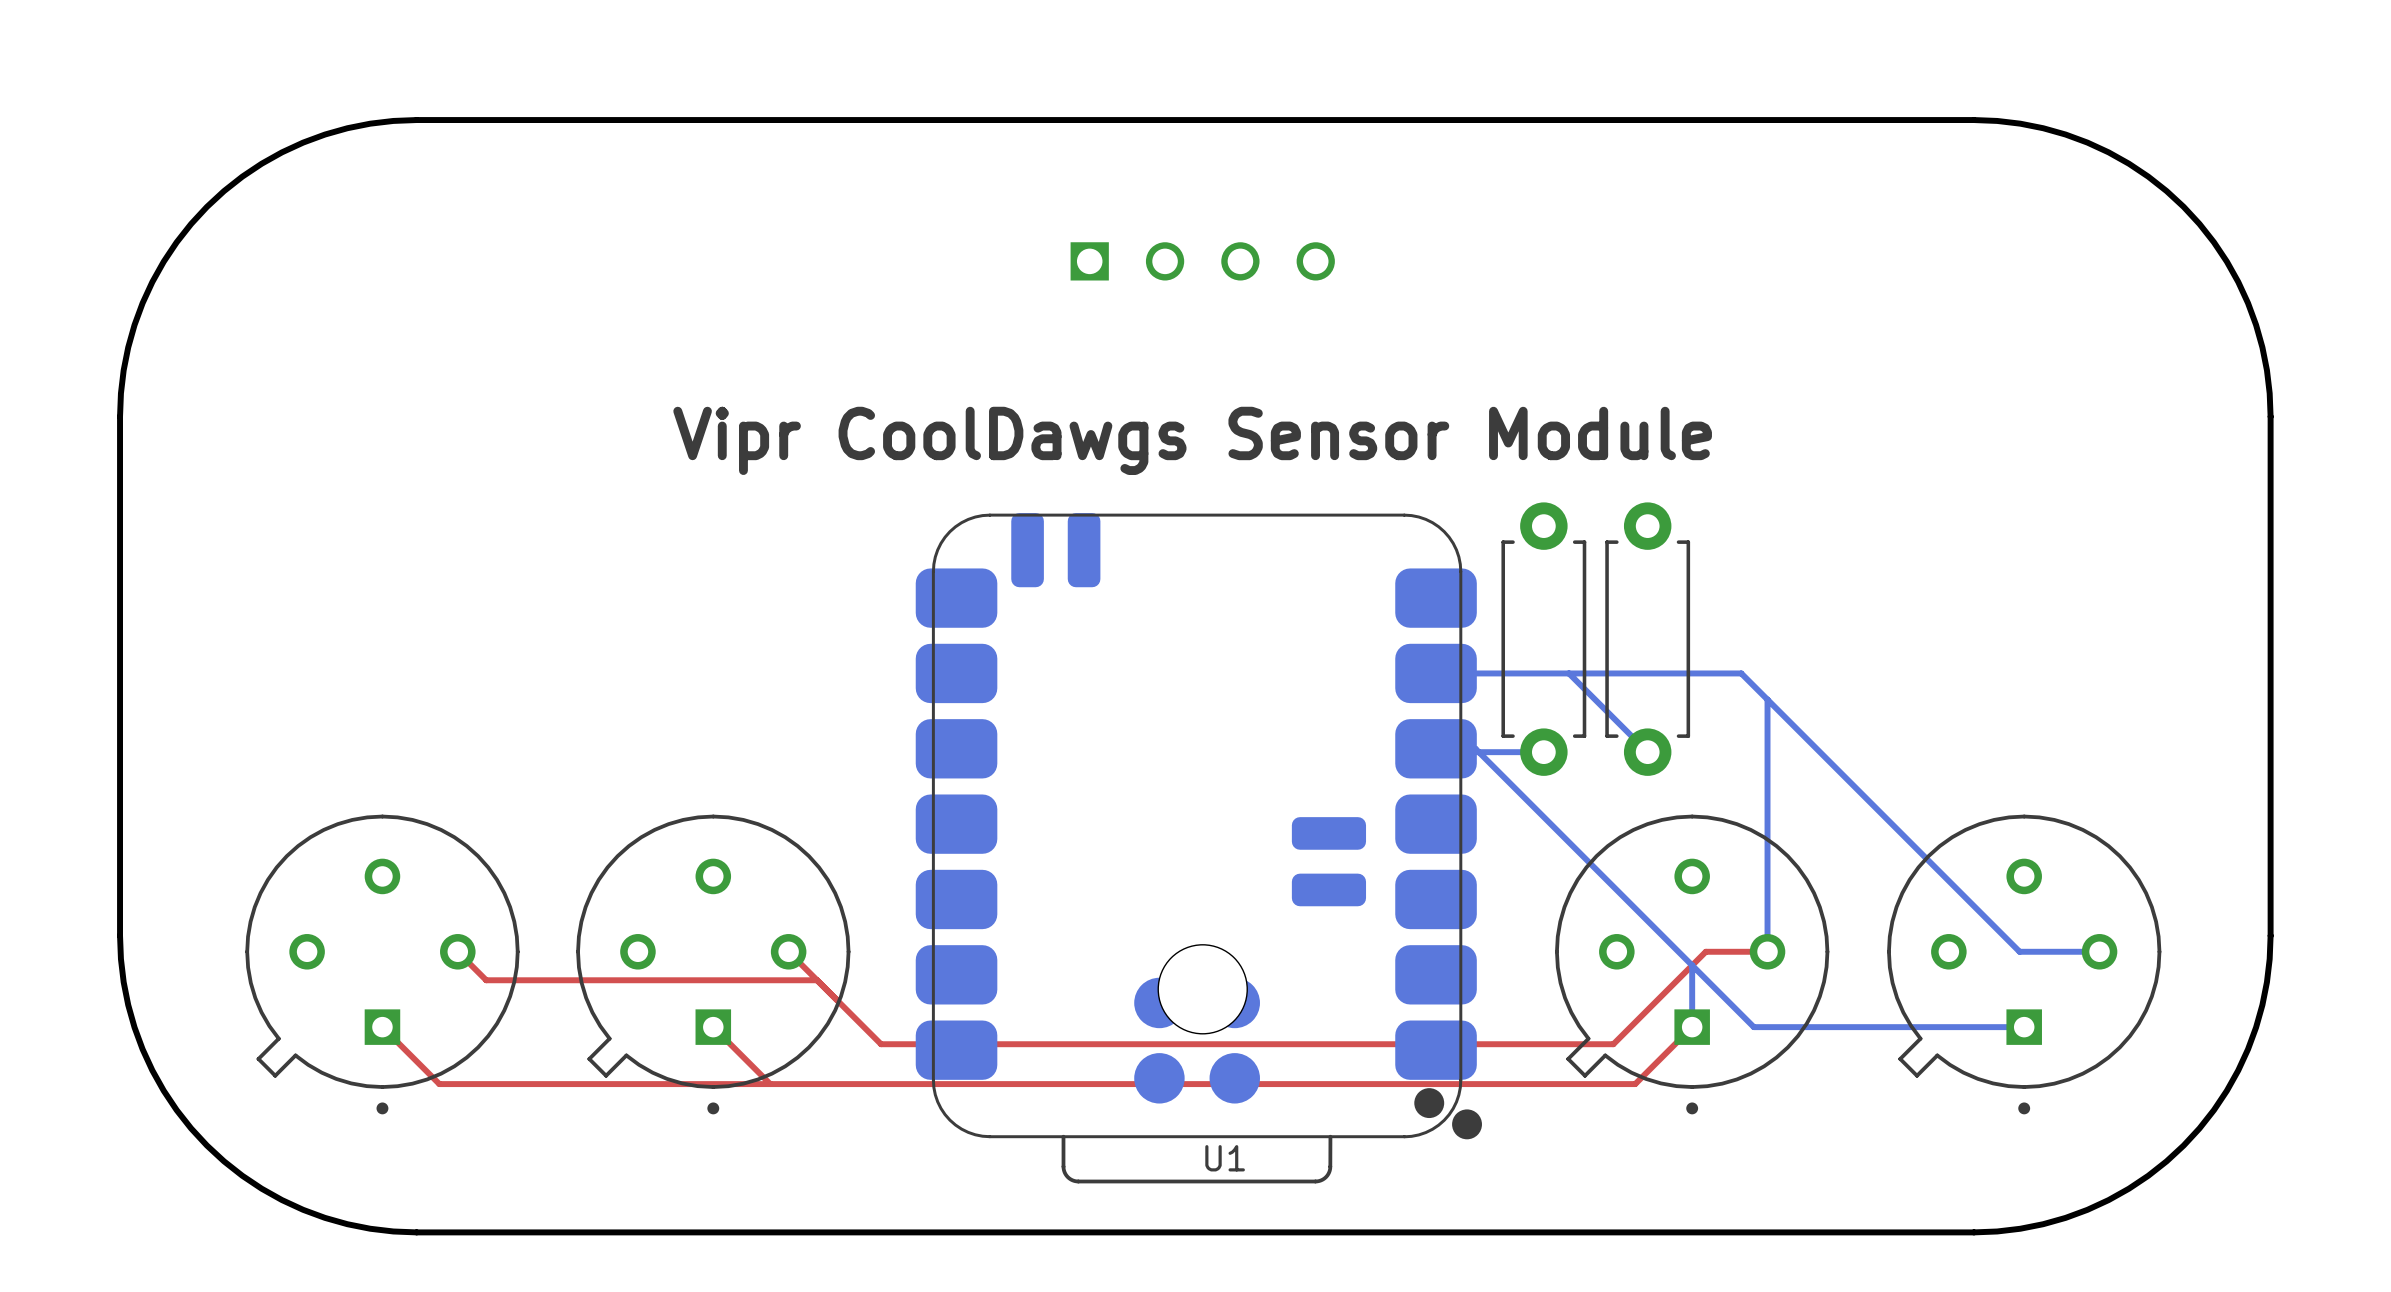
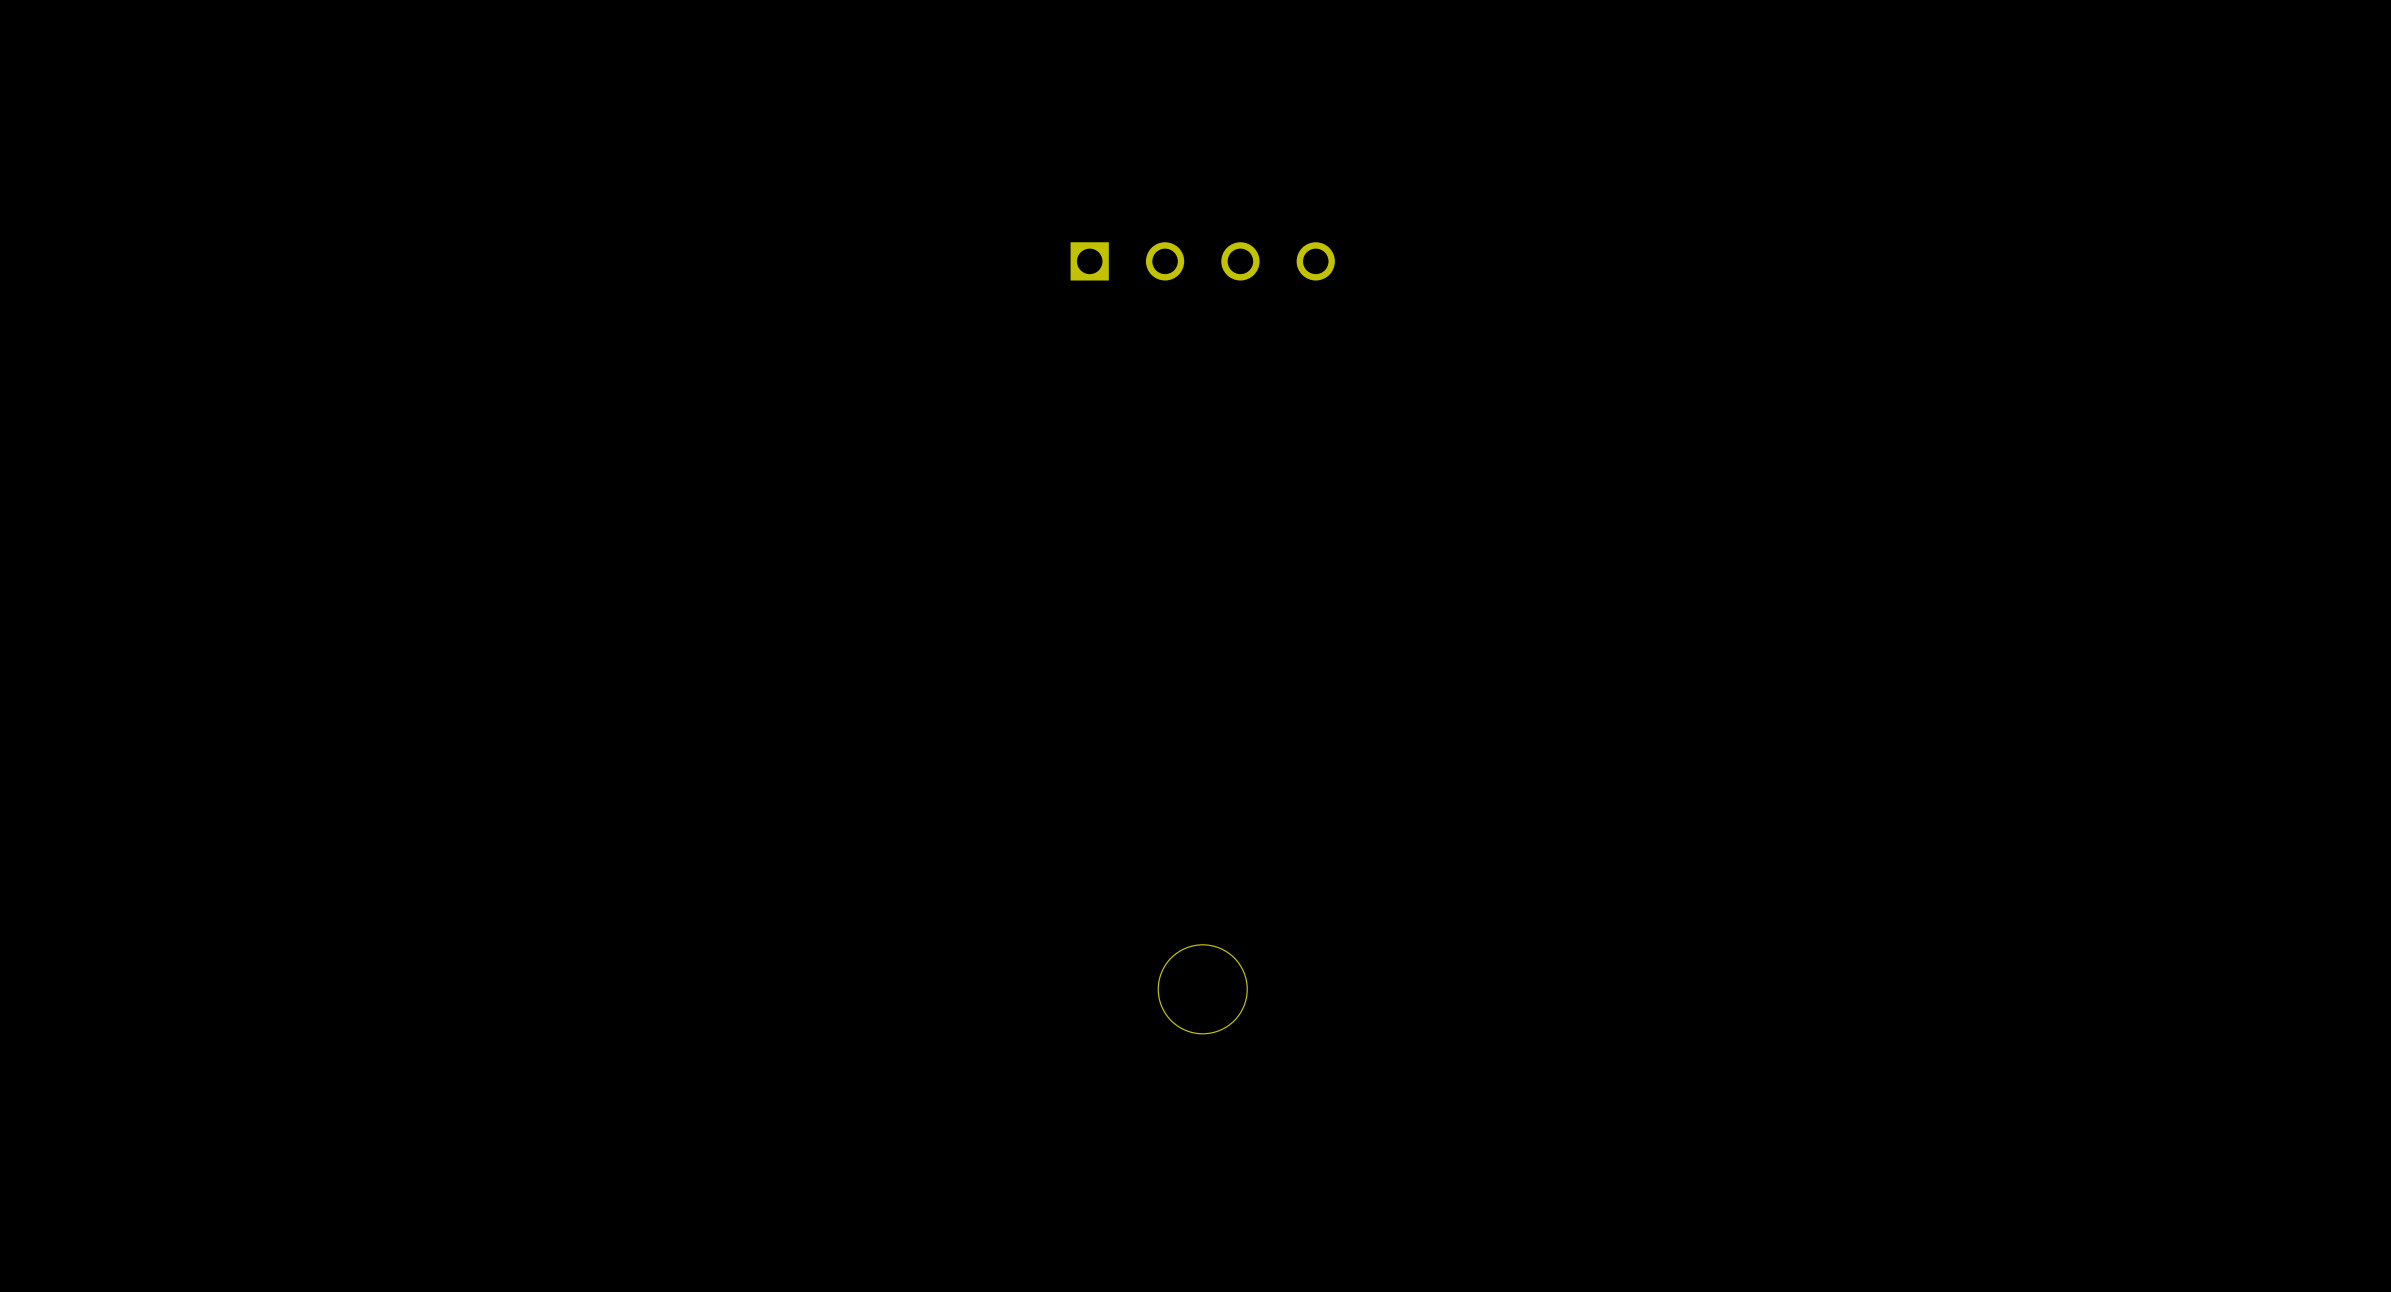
board edge: (1973, 120) (416, 120) (393, 120) (347, 128) (303, 142) (281, 152) (242, 176) (224, 191) (206, 206) (176, 242) (152, 281) (142, 303) (134, 325) (123, 370) (120, 416) (120, 959) (128, 1005) (142, 1049) (152, 1070) (176, 1110) (191, 1128) (224, 1161) (242, 1175) (281, 1200) (325, 1217) (347, 1224) (393, 1231) (1973, 1232) (2020, 1228) (2043, 1224) (2087, 1209) (2108, 1200) (2128, 1188) (2166, 1161) (2199, 1128) (2213, 1110) (2238, 1070) (2248, 1049) (2262, 1005) (2266, 982) (2270, 935) (2270, 416) (2266, 370) (2256, 325) (2238, 281) (2213, 242) (2199, 224) (2166, 191) (2128, 163) (2087, 142) (2043, 128) (2020, 123) (1973, 120) -> none
text: Vipr CoolDawgs Sensor Module (1192, 440) -> none
part: (1543, 639) -> none
part: (1647, 639) -> none
bottom track: (1436, 673) (1741, 673) (2019, 951) (2099, 951) -> none
bottom track: (1568, 673) (1647, 752) -> none
bottom track: (1767, 699) (1767, 951) -> none
bottom track: (1543, 752) (1439, 752) (1436, 748) (1475, 748) (1753, 1027) (2024, 1027) -> none
U1: (1198, 848) -> none
top track: (457, 951) (486, 980) (817, 980) -> none
top track: (1767, 951) (1705, 951) (1613, 1044) (881, 1044) (788, 951) -> none
part: (382, 964) -> none
part: (713, 964) -> none
part: (1692, 964) -> none
part: (2024, 964) -> none
bottom track: (1692, 965) (1692, 1027) -> none
top track: (713, 1027) (770, 1084) -> none
top track: (1692, 1027) (1635, 1084) (439, 1084) (382, 1027) -> none

